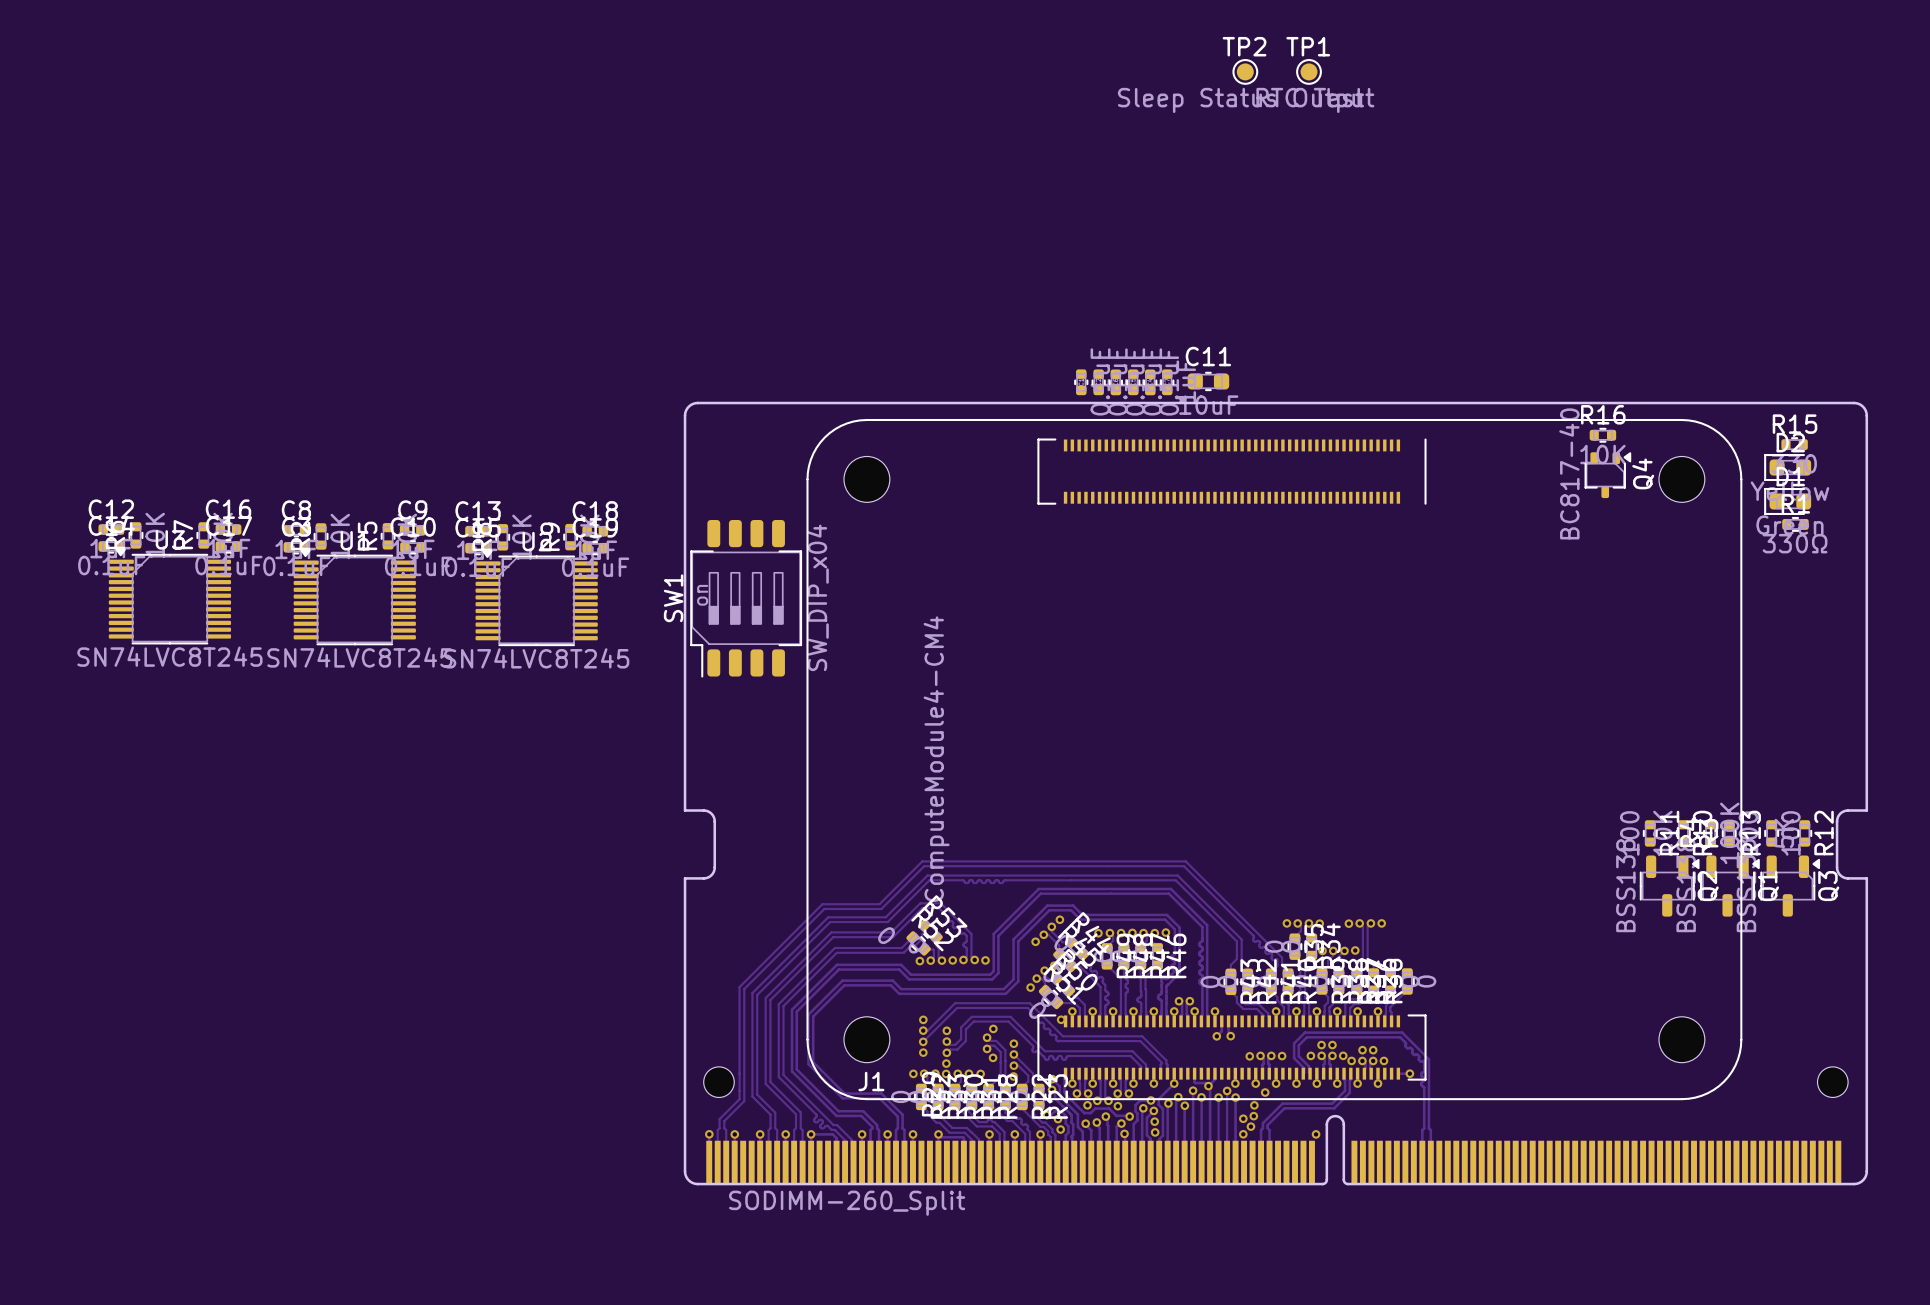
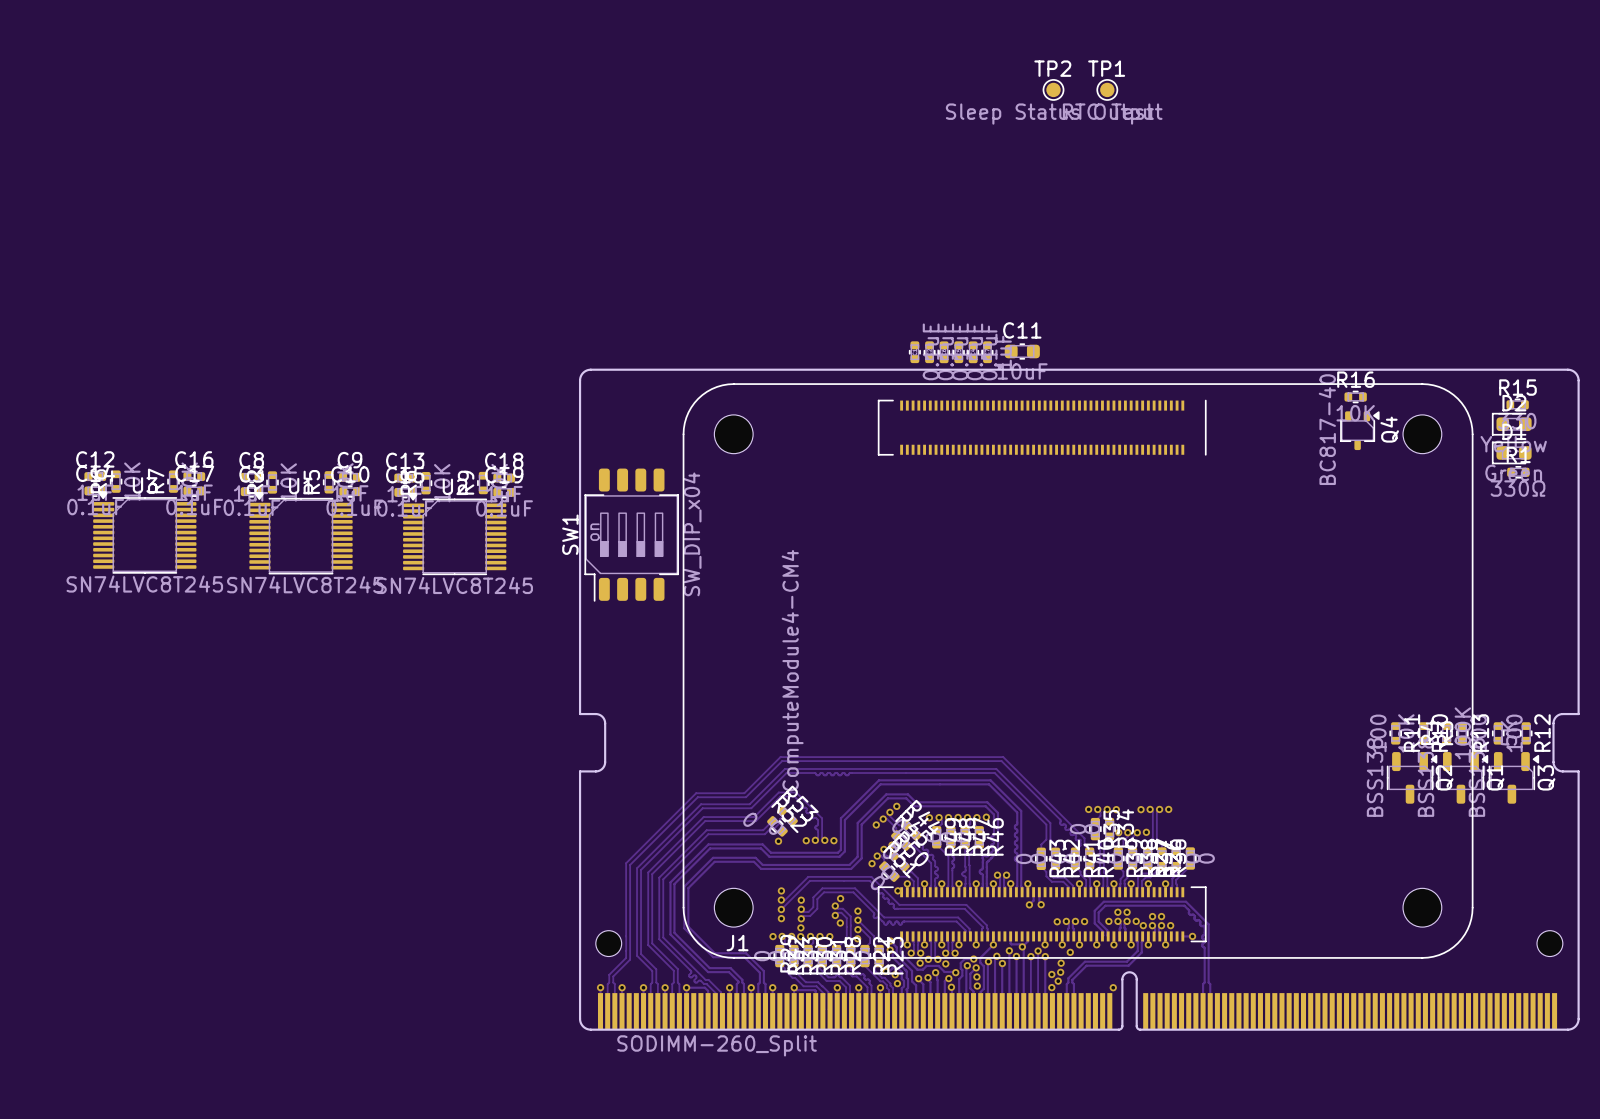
track: (936, 937) (938, 957) (941, 960) -> none
track: (924, 949) (933, 950) (933, 957) (930, 960) -> none
via: (930, 960) -> none
via: (941, 960) -> none

